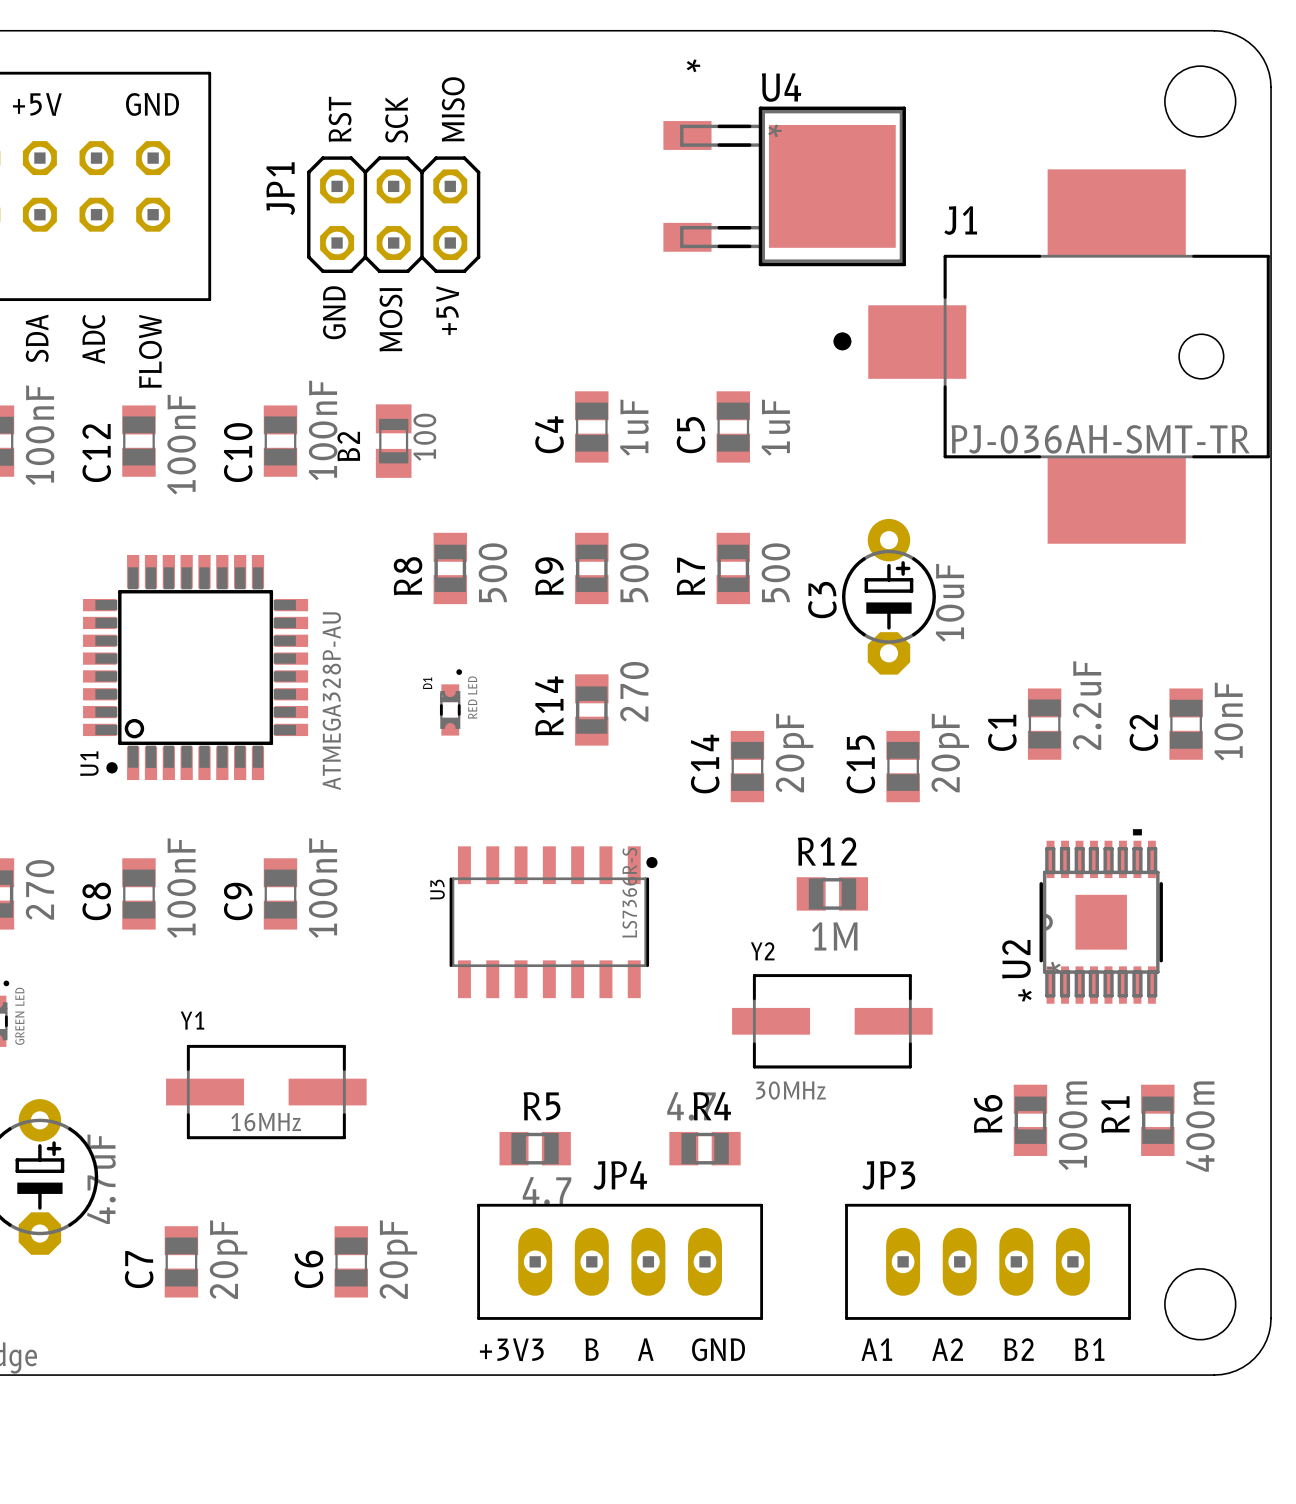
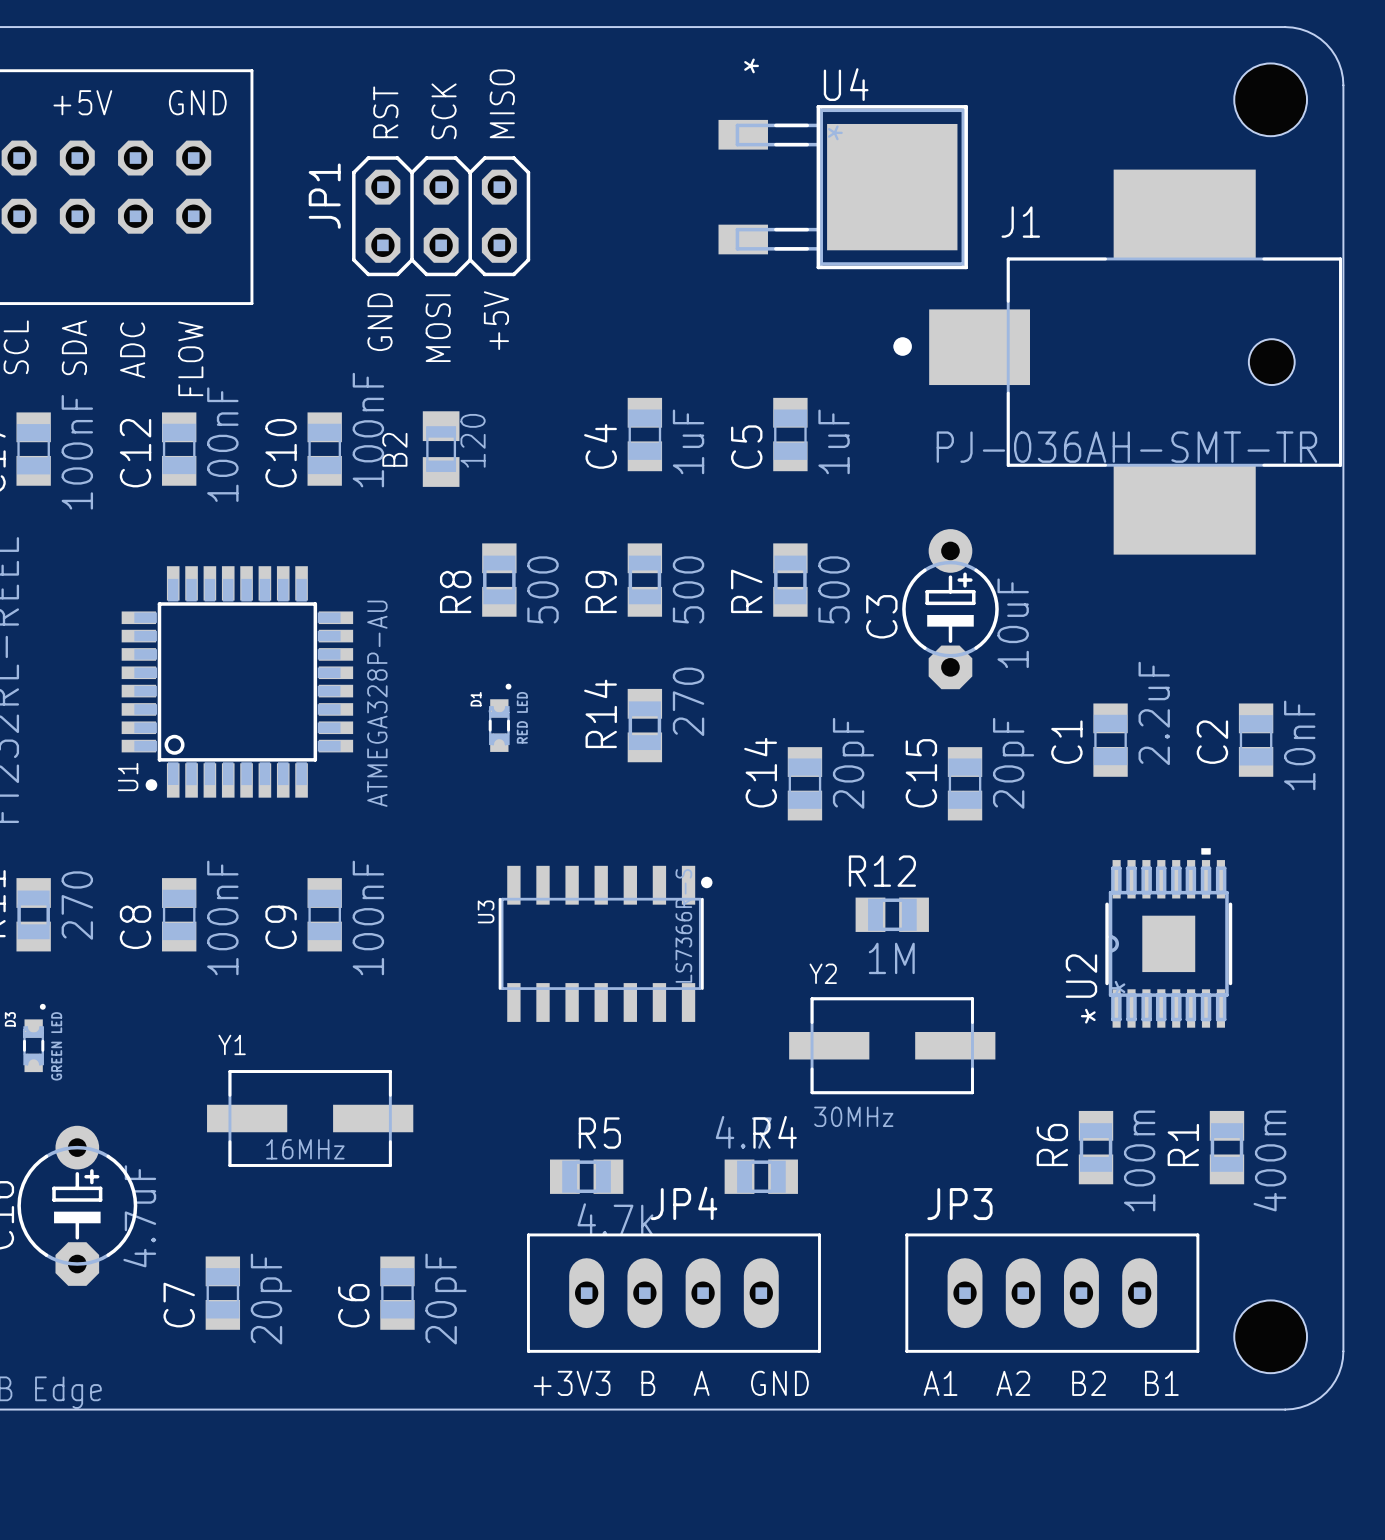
B2 value: 100 (424, 437) -> 120 (473, 440)
R5 value: 4.7 (547, 1191) -> 4.7k (615, 1219)

